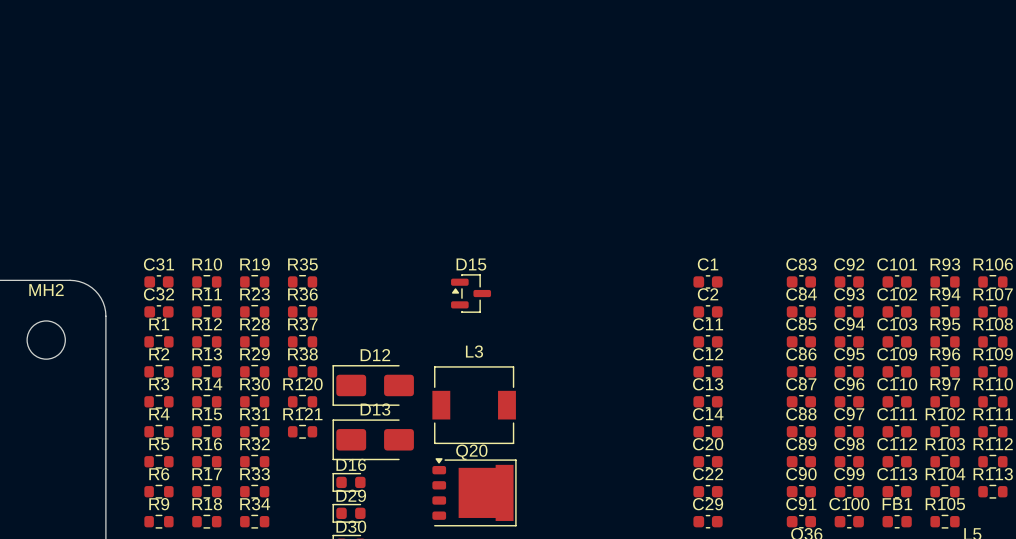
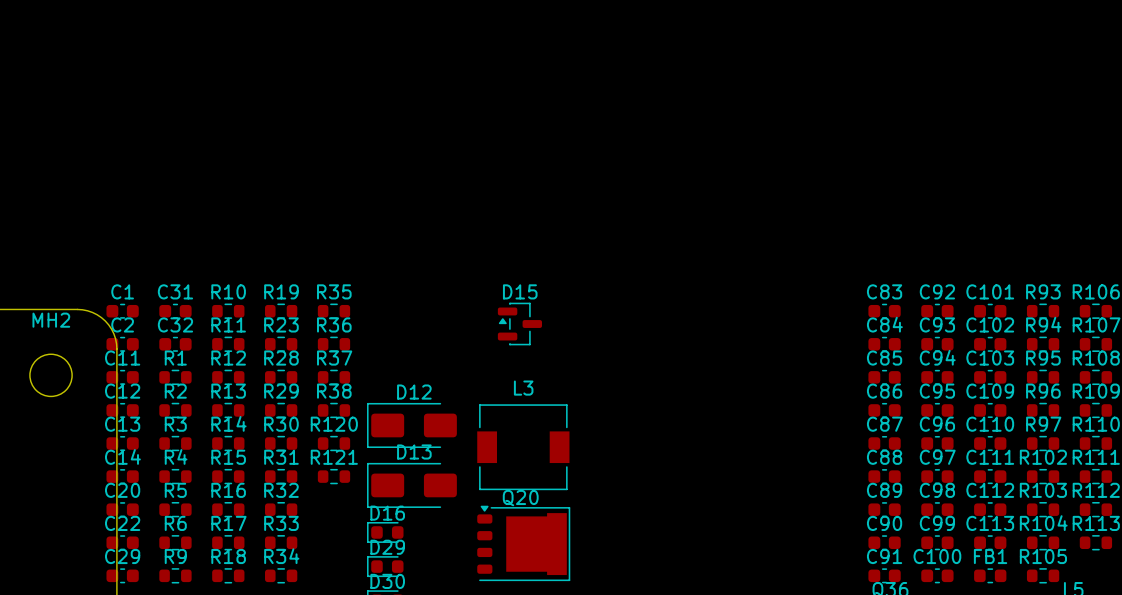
C1 position: (708, 281) -> (122, 311)
C2 position: (708, 311) -> (122, 344)
C11 position: (708, 341) -> (122, 377)
C12 position: (708, 371) -> (122, 410)
C13 position: (708, 401) -> (122, 443)
C14 position: (708, 431) -> (122, 476)
C20 position: (708, 461) -> (122, 509)
C22 position: (708, 491) -> (122, 542)
C29 position: (708, 521) -> (122, 575)

